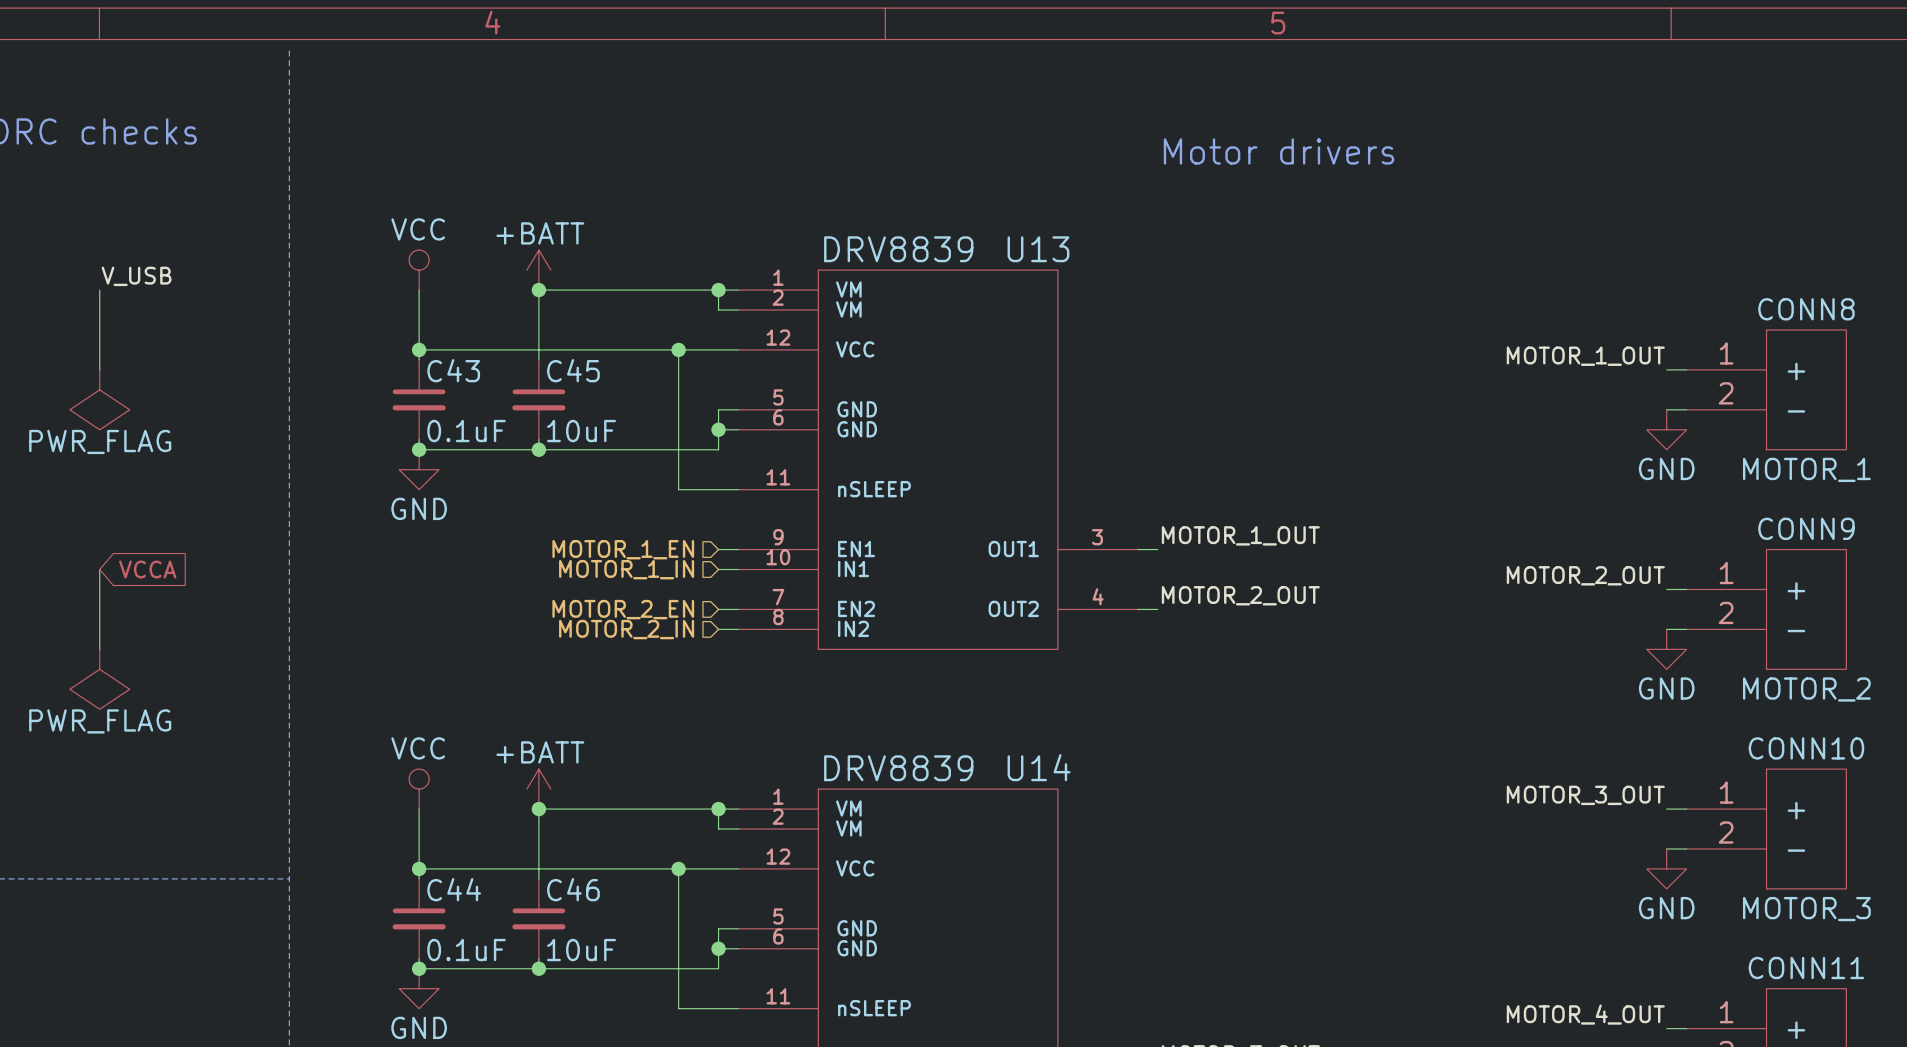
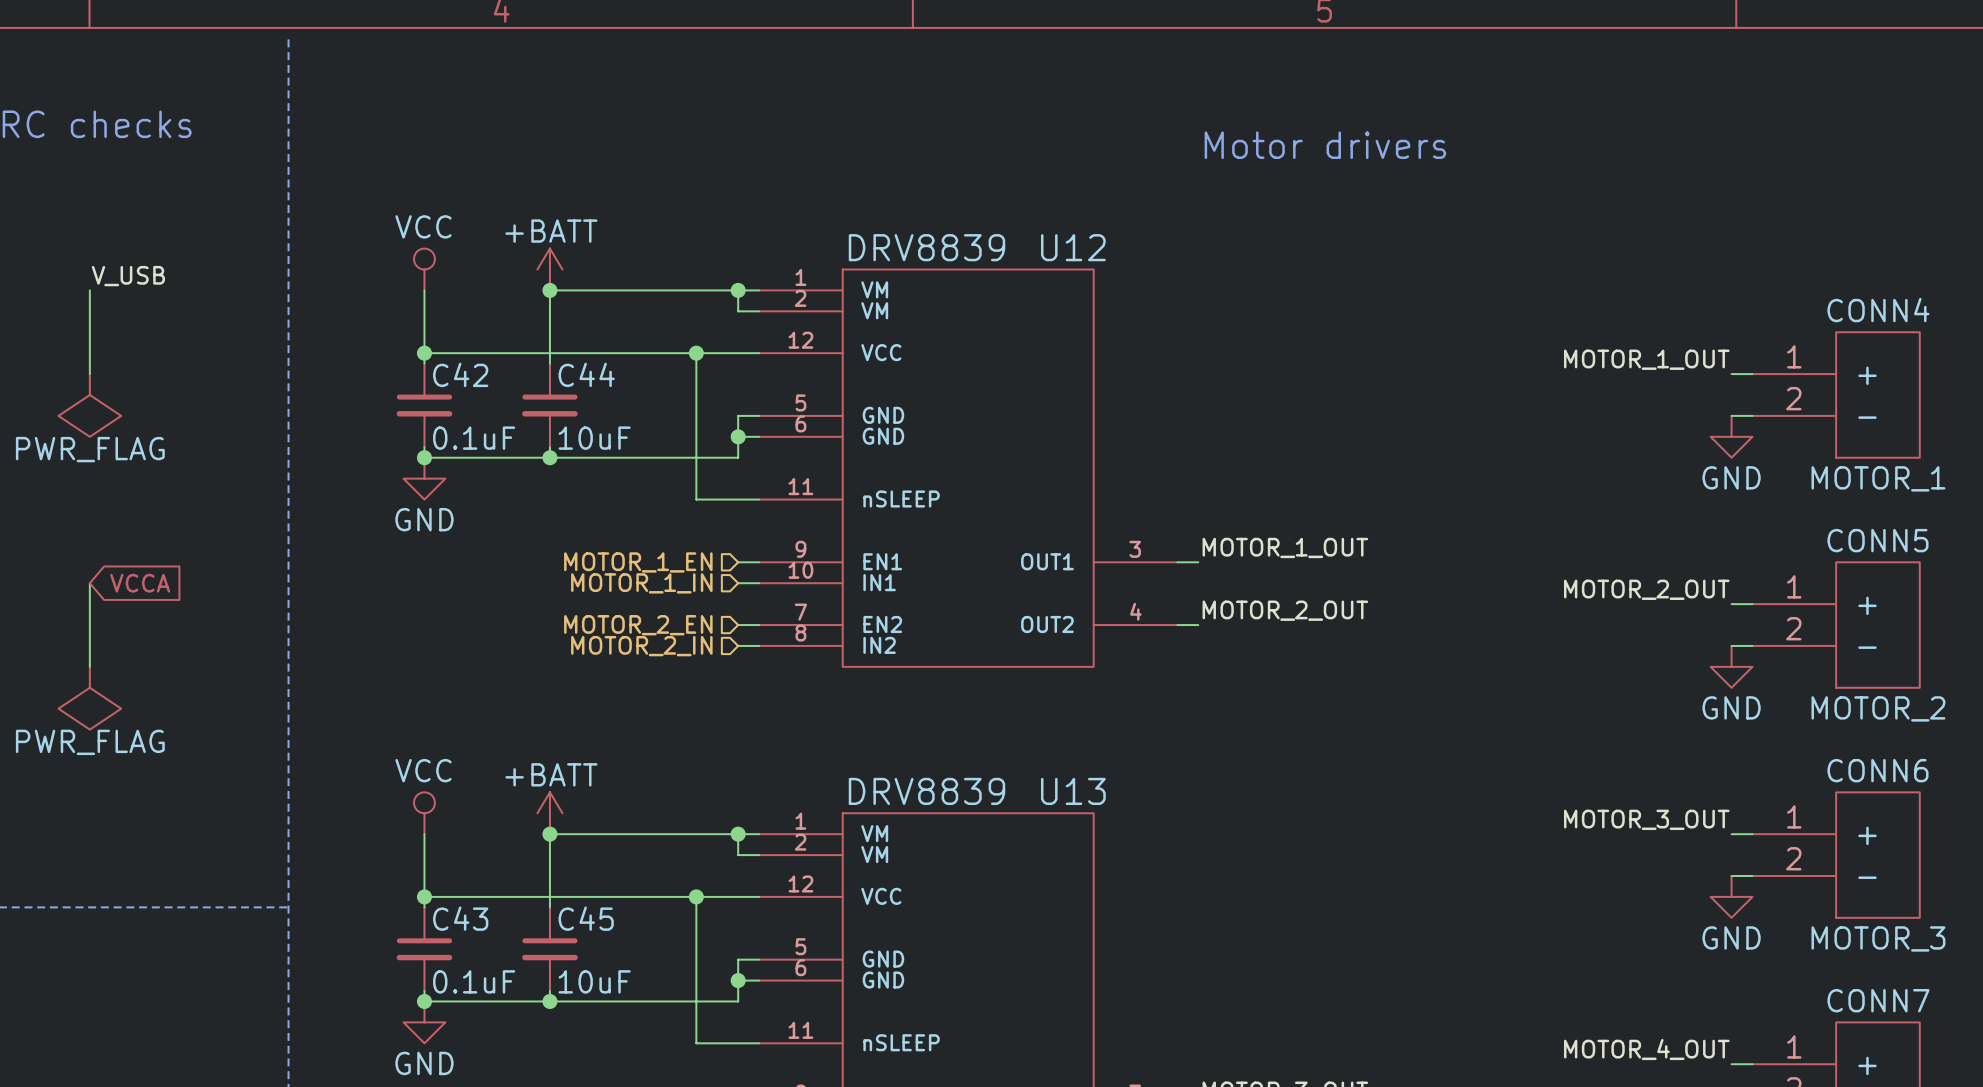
U13 name: U13 (1038, 249) -> U12 (1073, 247)
CONN8 name: CONN8 (1806, 309) -> CONN4 (1878, 310)
C43 name: C43 (453, 370) -> C42 (460, 374)
C45 name: C45 (573, 370) -> C44 (586, 374)
CONN9 name: CONN9 (1806, 528) -> CONN5 (1877, 540)
CONN10 name: CONN10 (1806, 748) -> CONN6 (1877, 770)
U14 name: U14 (1039, 767) -> U13 (1073, 791)
C44 name: C44 (454, 889) -> C43 (460, 918)
C46 name: C46 (573, 889) -> C45 (586, 918)
CONN11 name: CONN11 (1806, 968) -> CONN7 (1878, 1000)

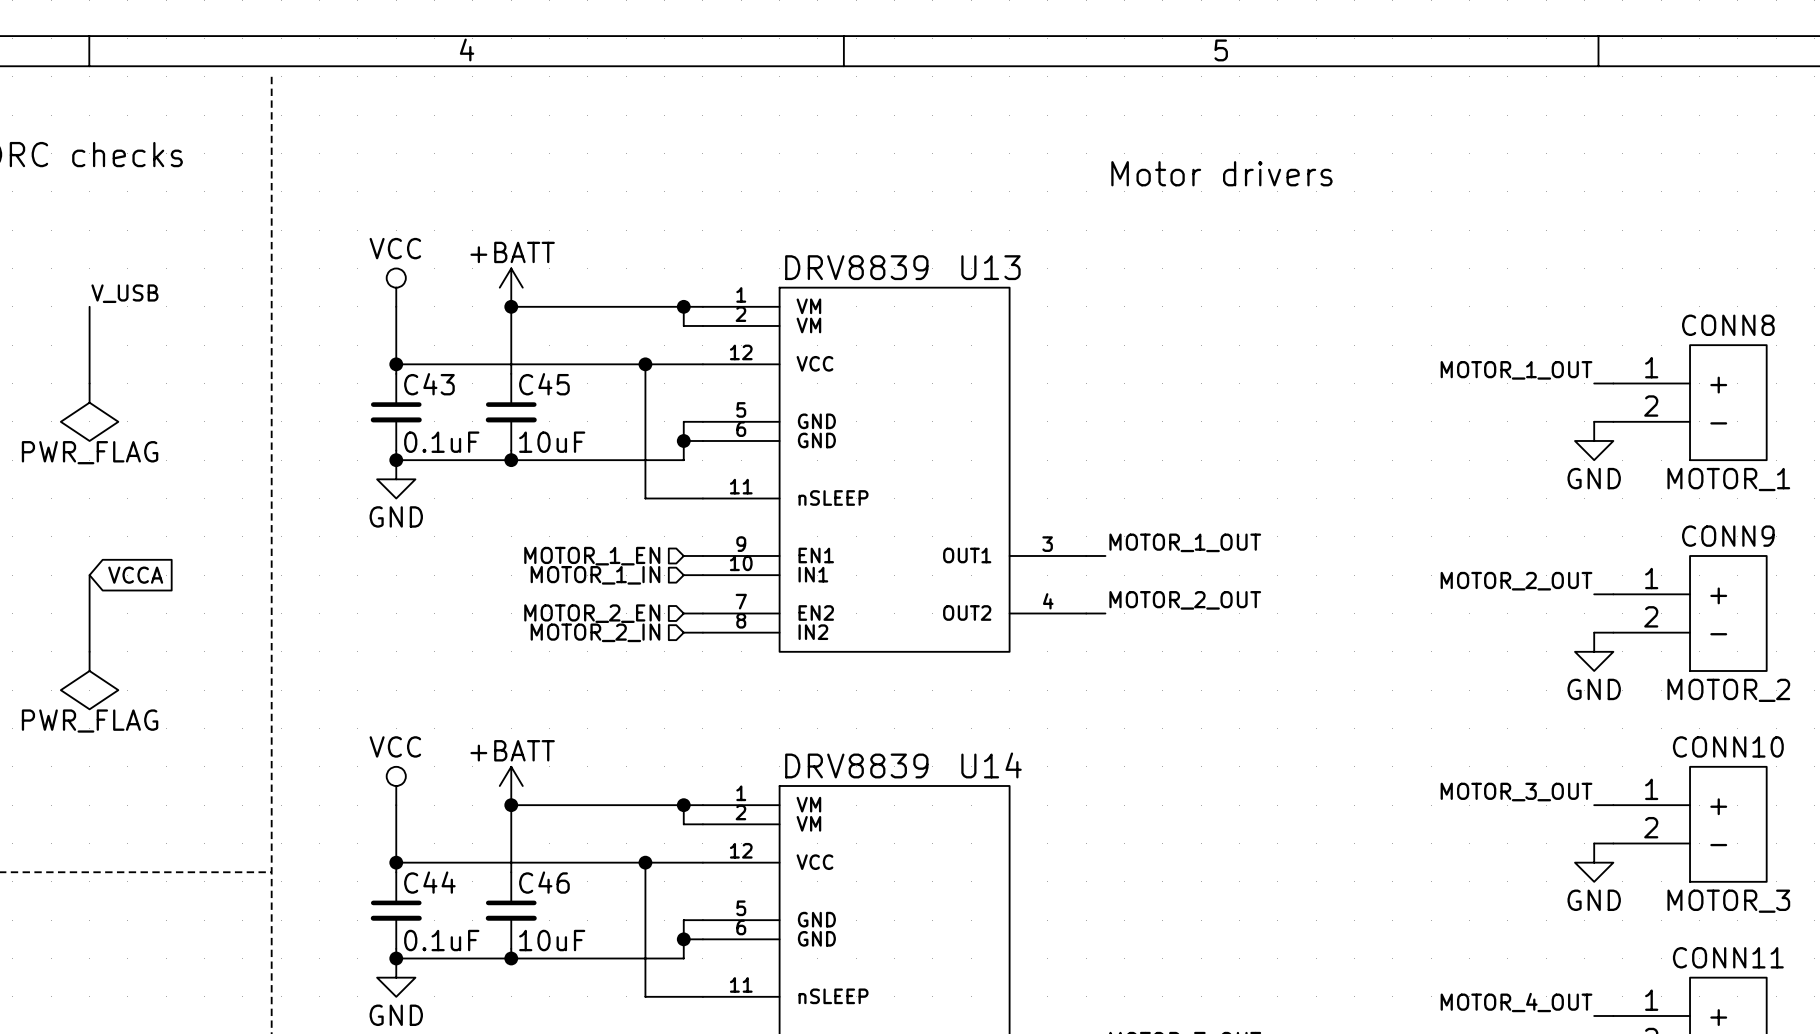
U12 name: U12 (1073, 247) -> U13 (990, 267)
CONN4 name: CONN4 (1878, 310) -> CONN8 (1728, 325)
C42 name: C42 (460, 374) -> C43 (429, 384)
C44 name: C44 (586, 374) -> C45 (544, 384)
CONN5 name: CONN5 (1877, 540) -> CONN9 (1728, 536)
CONN6 name: CONN6 (1877, 770) -> CONN10 (1728, 746)
U13 name: U13 (1073, 791) -> U14 (991, 765)
C43 name: C43 (460, 918) -> C44 (429, 882)
C45 name: C45 (586, 918) -> C46 (544, 882)
CONN7 name: CONN7 (1878, 1000) -> CONN11 (1728, 957)

